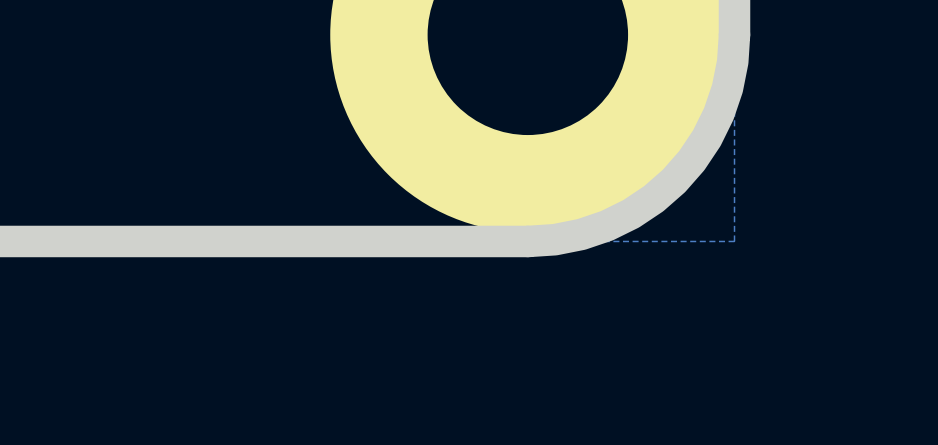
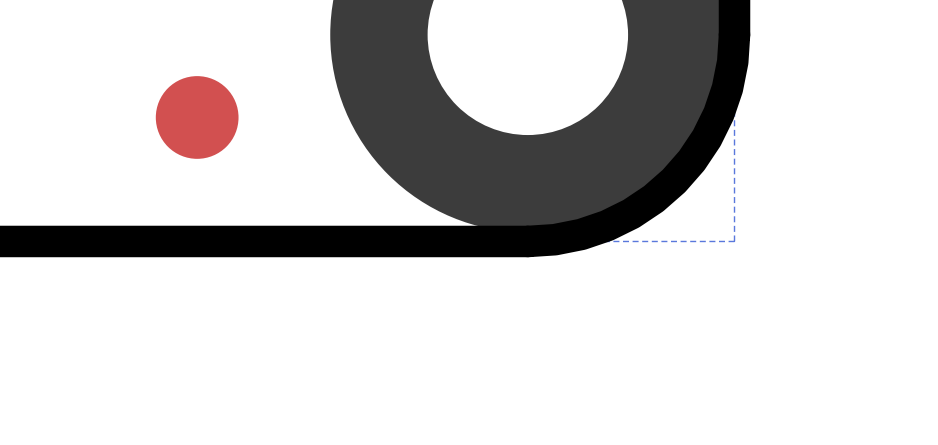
part: none -> (197, 117)

